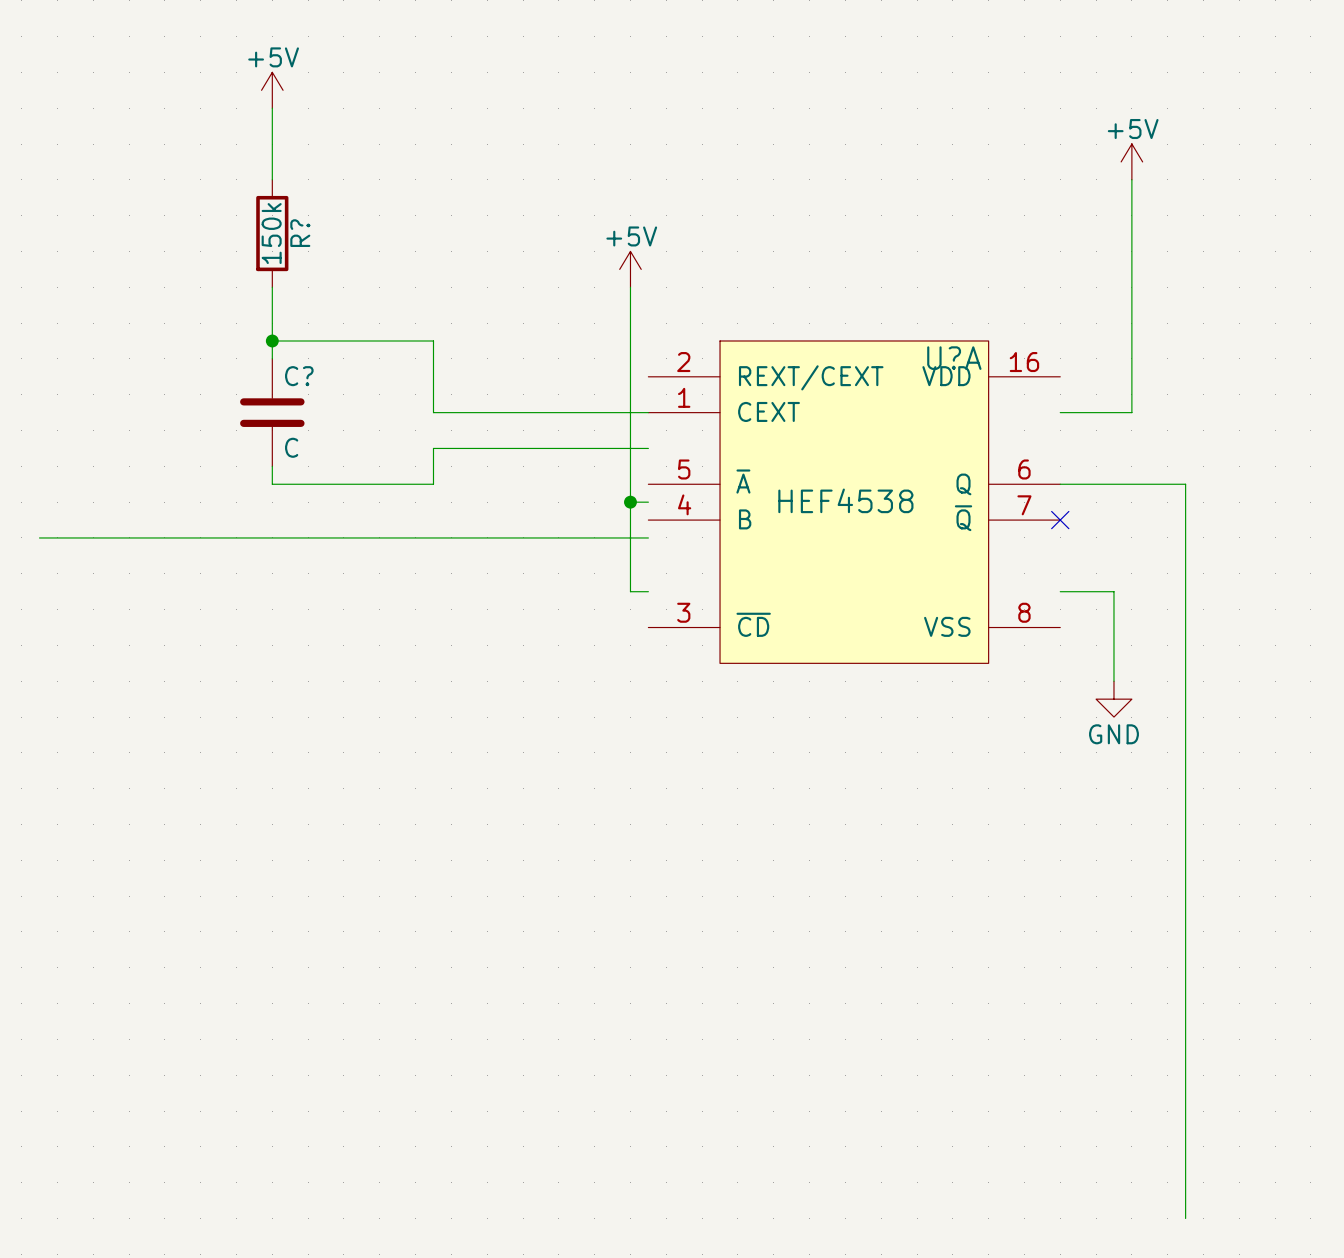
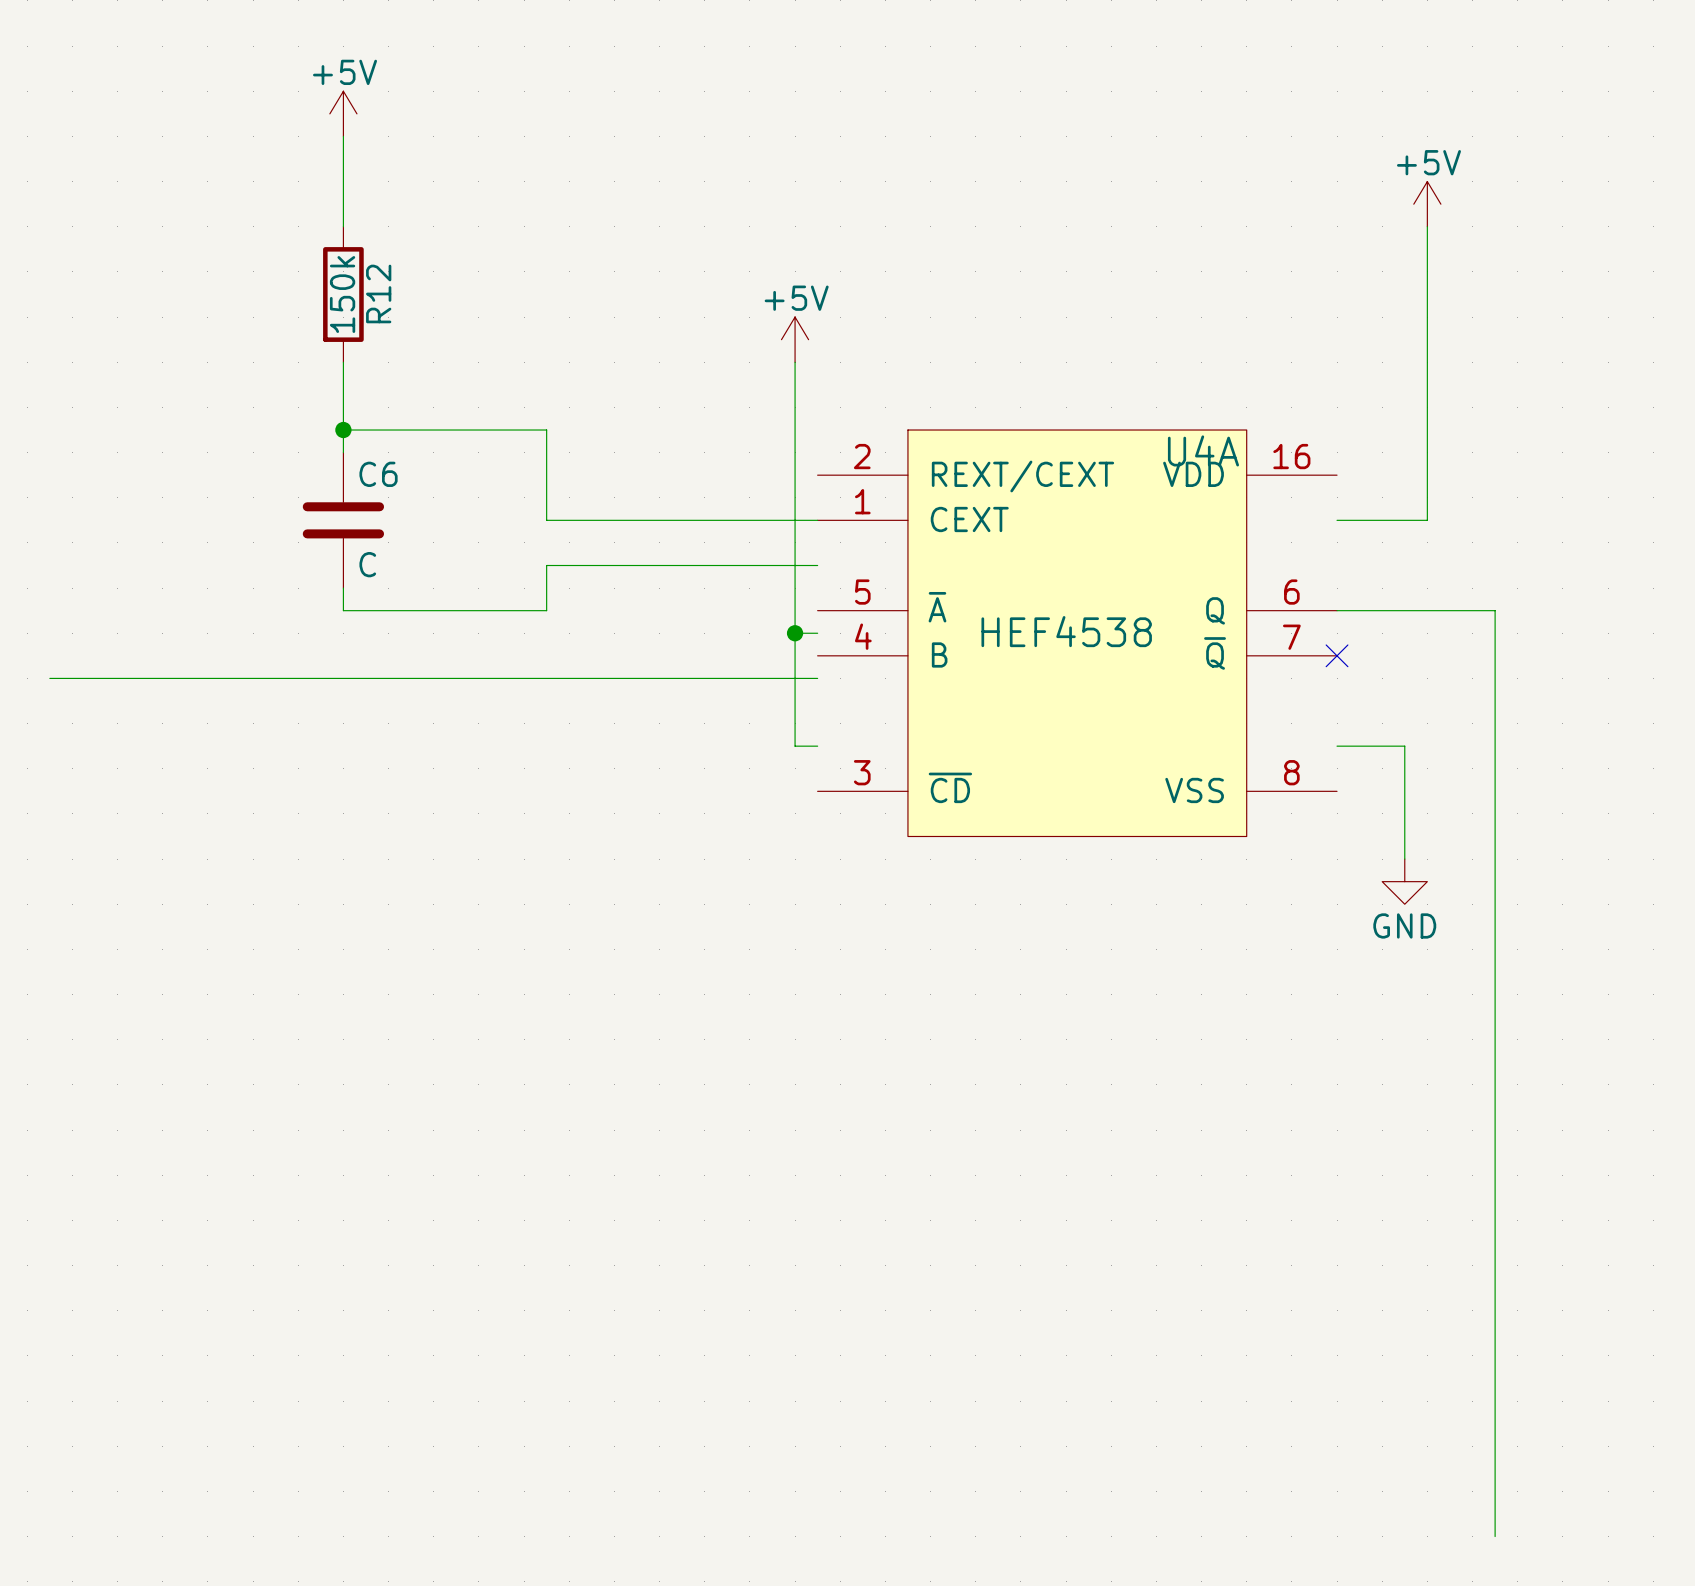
R? name: R? (300, 233) -> R12 (378, 293)
U?A name: U?A (954, 358) -> U4A (1203, 450)
C? name: C? (299, 376) -> C6 (378, 474)

